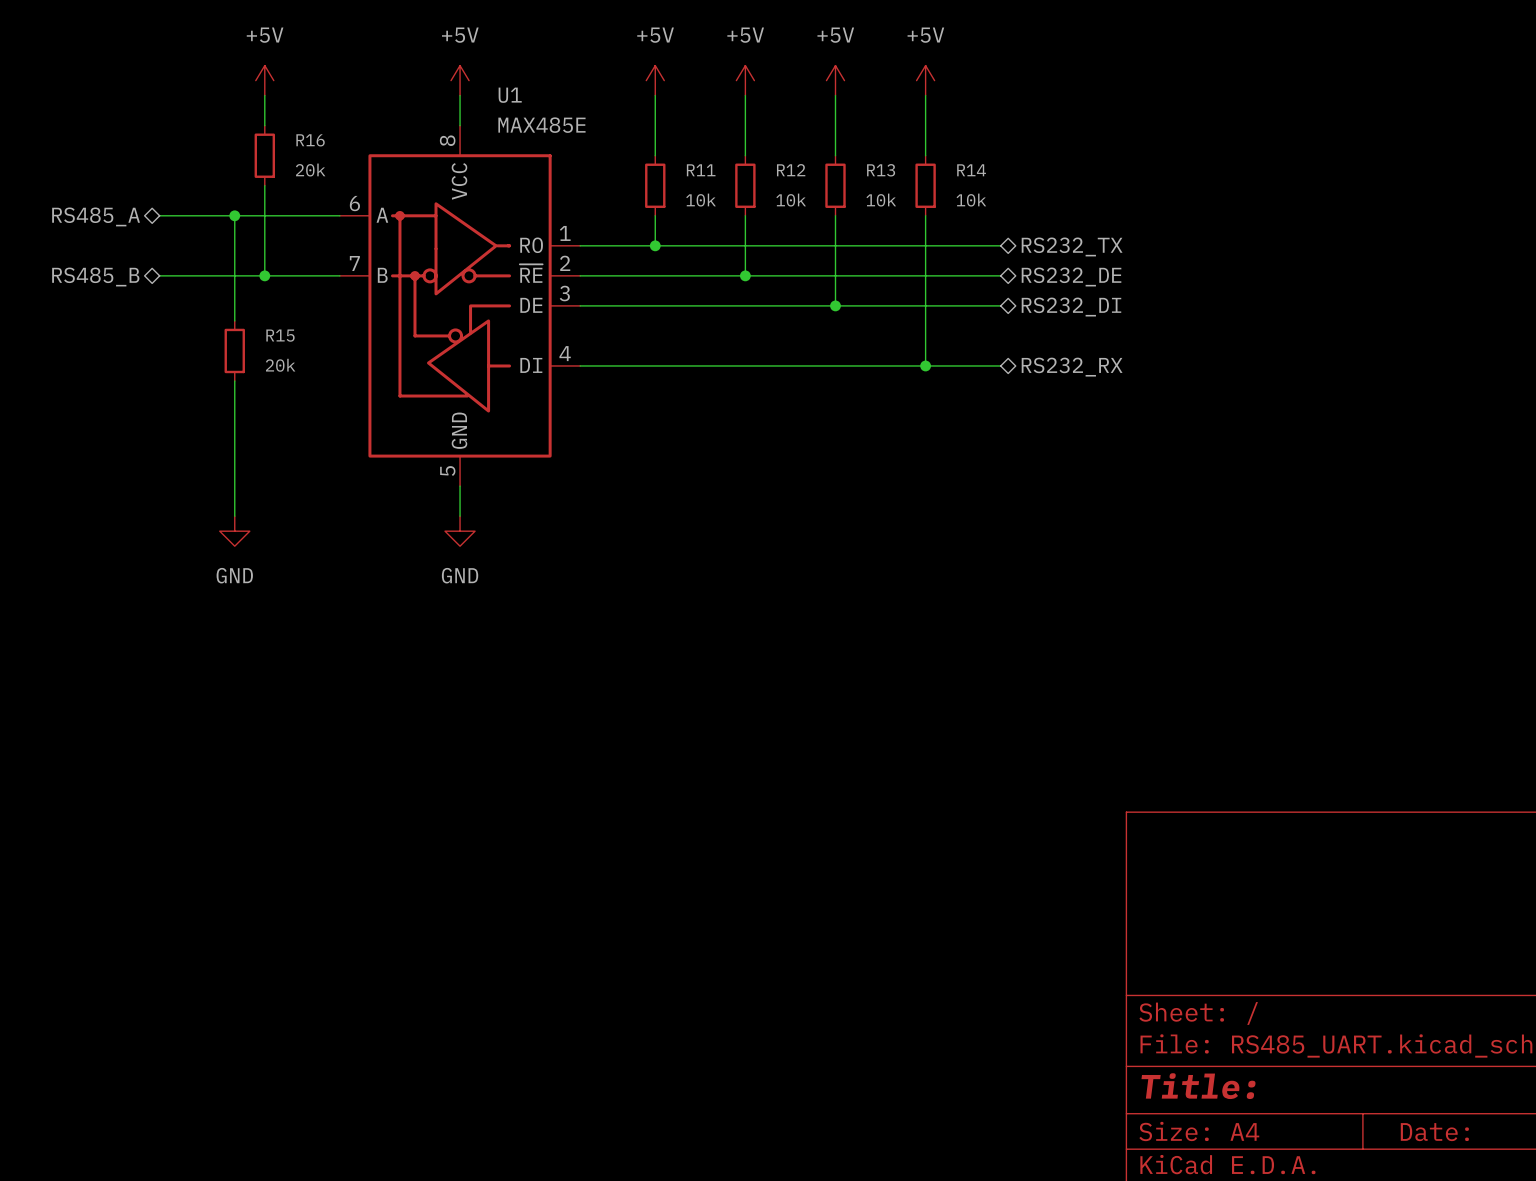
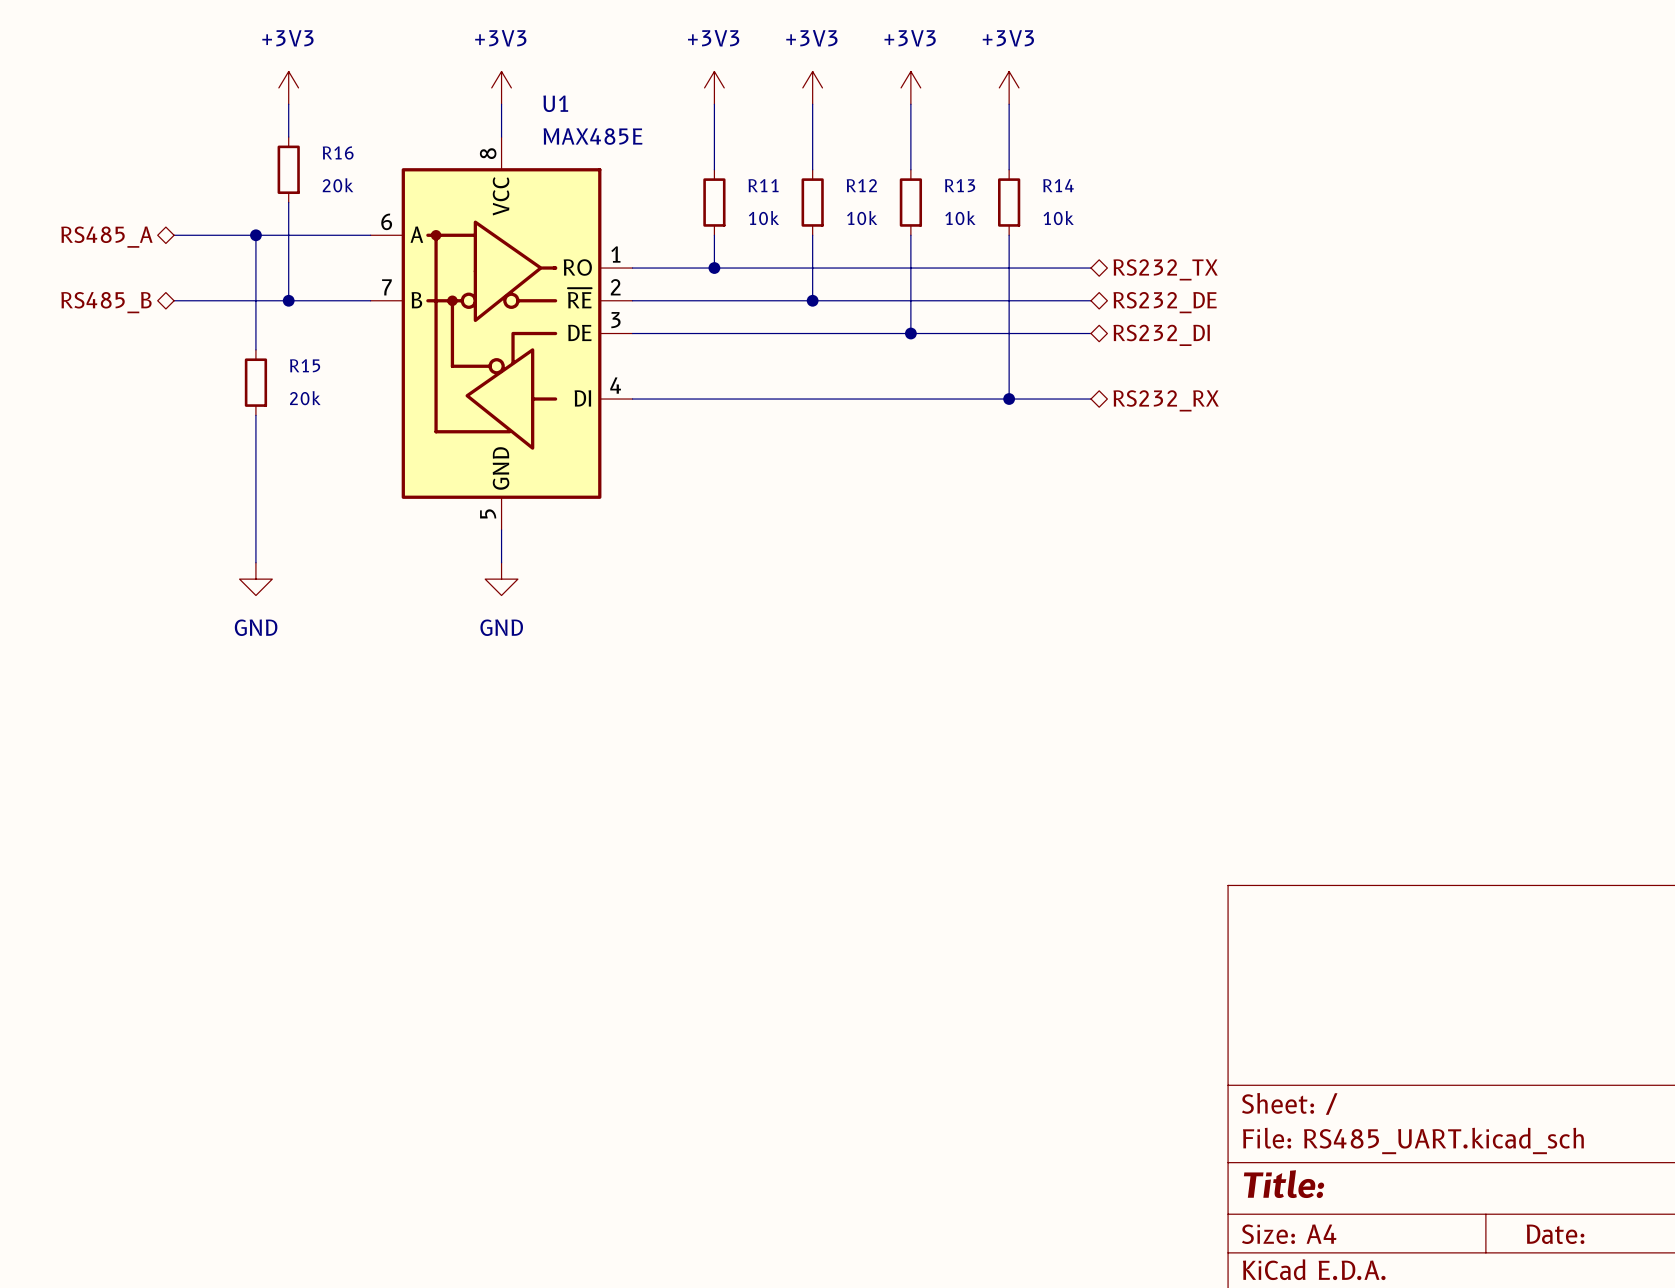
power symbol: +5V (264, 80) -> +3V3 (288, 87)
power symbol: +5V (460, 80) -> +3V3 (501, 87)
power symbol: +5V (655, 80) -> +3V3 (714, 87)
power symbol: +5V (745, 80) -> +3V3 (812, 87)
power symbol: +5V (835, 80) -> +3V3 (910, 87)
power symbol: +5V (925, 80) -> +3V3 (1009, 87)

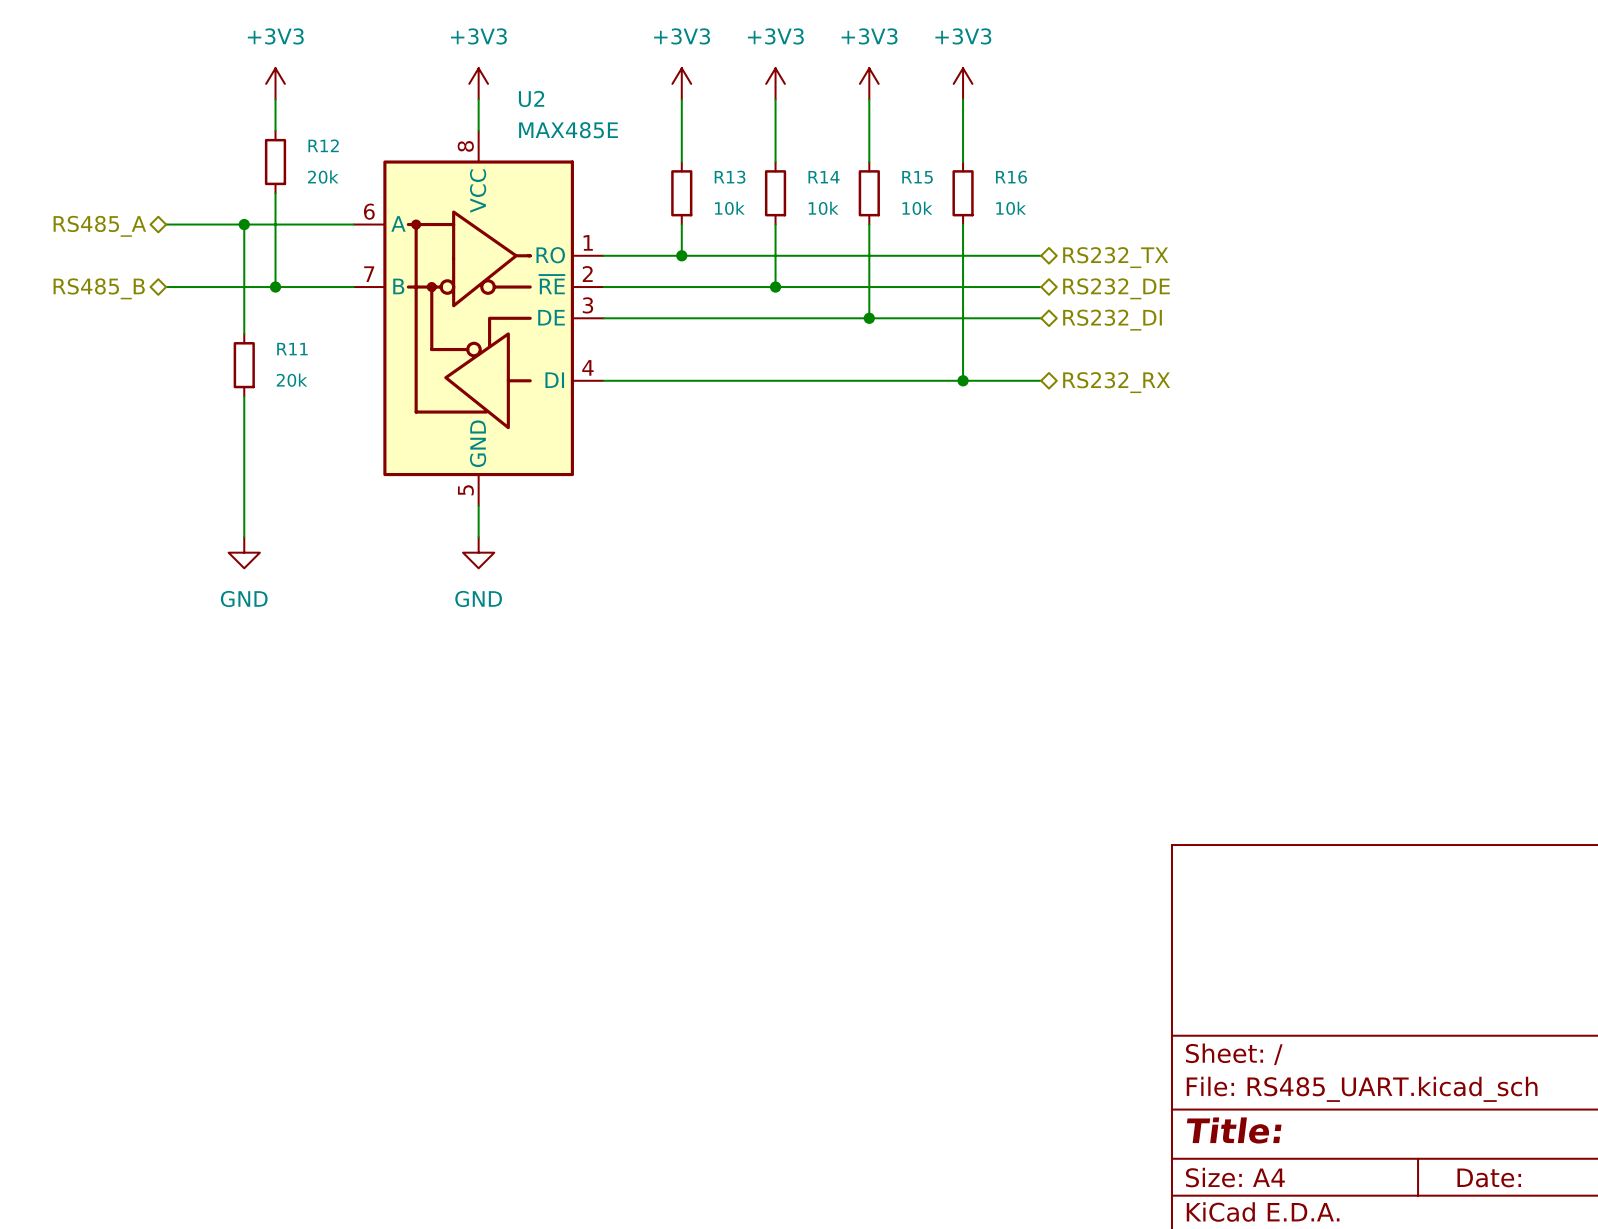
U1 name: U1 (555, 103) -> U2 (531, 98)
R16 name: R16 (338, 152) -> R12 (323, 145)
R11 name: R11 (763, 185) -> R13 (730, 177)
R12 name: R12 (861, 185) -> R14 (824, 177)
R13 name: R13 (960, 185) -> R15 (917, 177)
R14 name: R14 (1058, 185) -> R16 (1011, 177)
R15 name: R15 (305, 365) -> R11 (292, 349)

